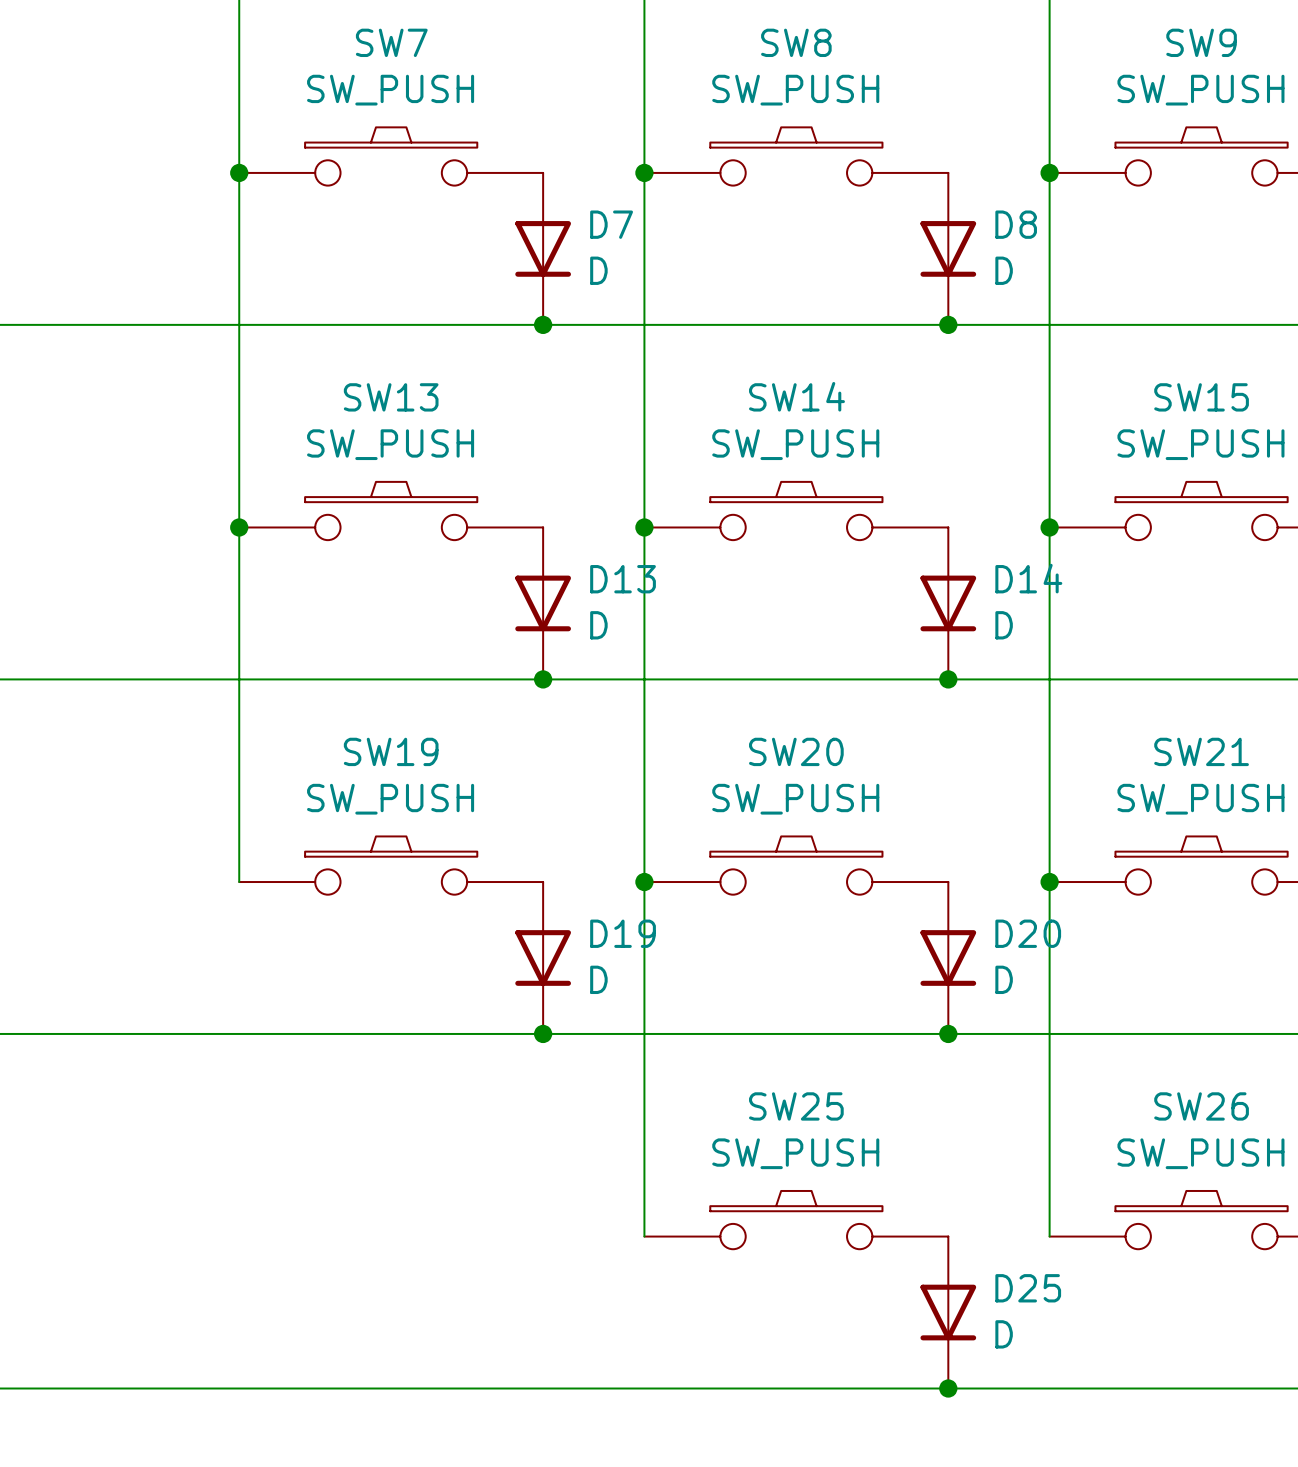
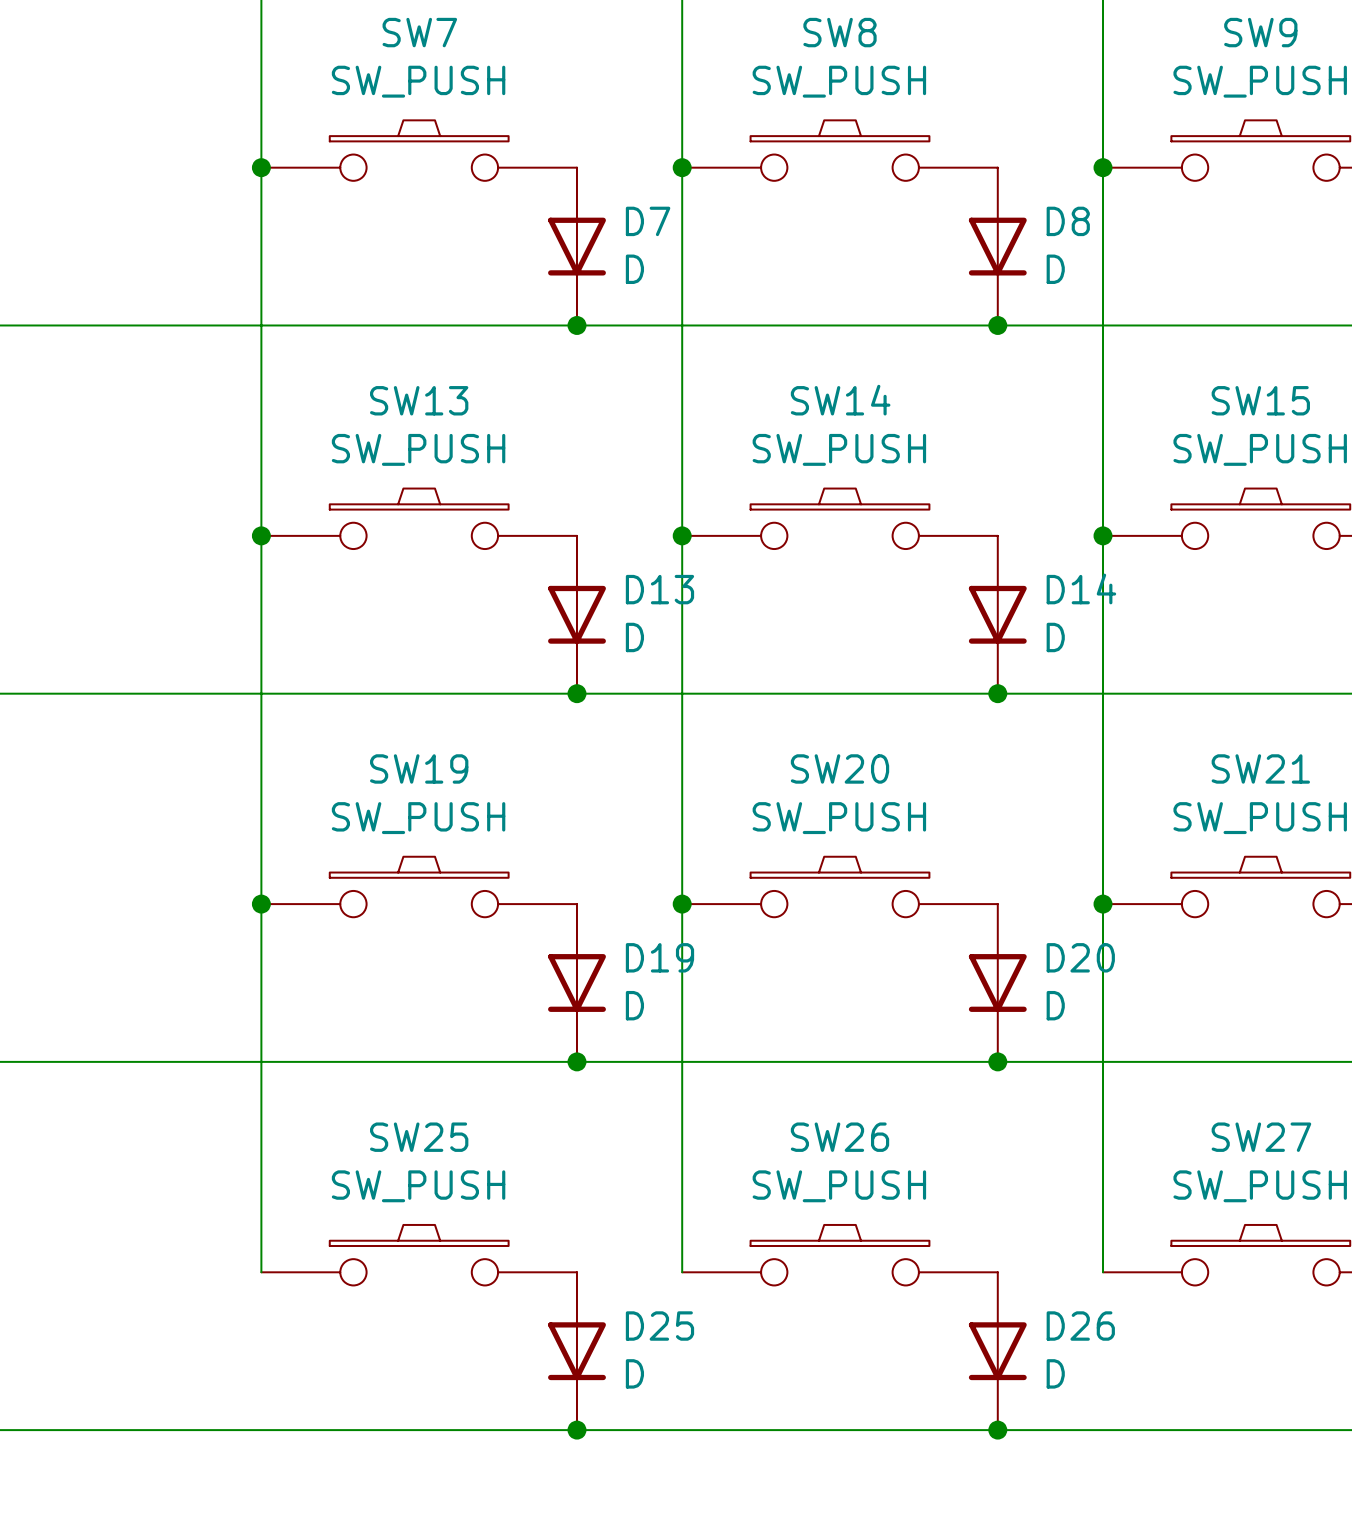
wire: none -> (261, 904) (261, 1272)
junction: none -> (261, 904)
SW25 name: SW25 (796, 1106) -> SW26 (839, 1137)
SW26 name: SW26 (1201, 1106) -> SW27 (1261, 1137)
SW25: none -> SW_PUSH (419, 1255)
D25 name: D25 (1028, 1288) -> D26 (1080, 1326)
D25: none -> D (576, 1351)
junction: none -> (576, 1430)

